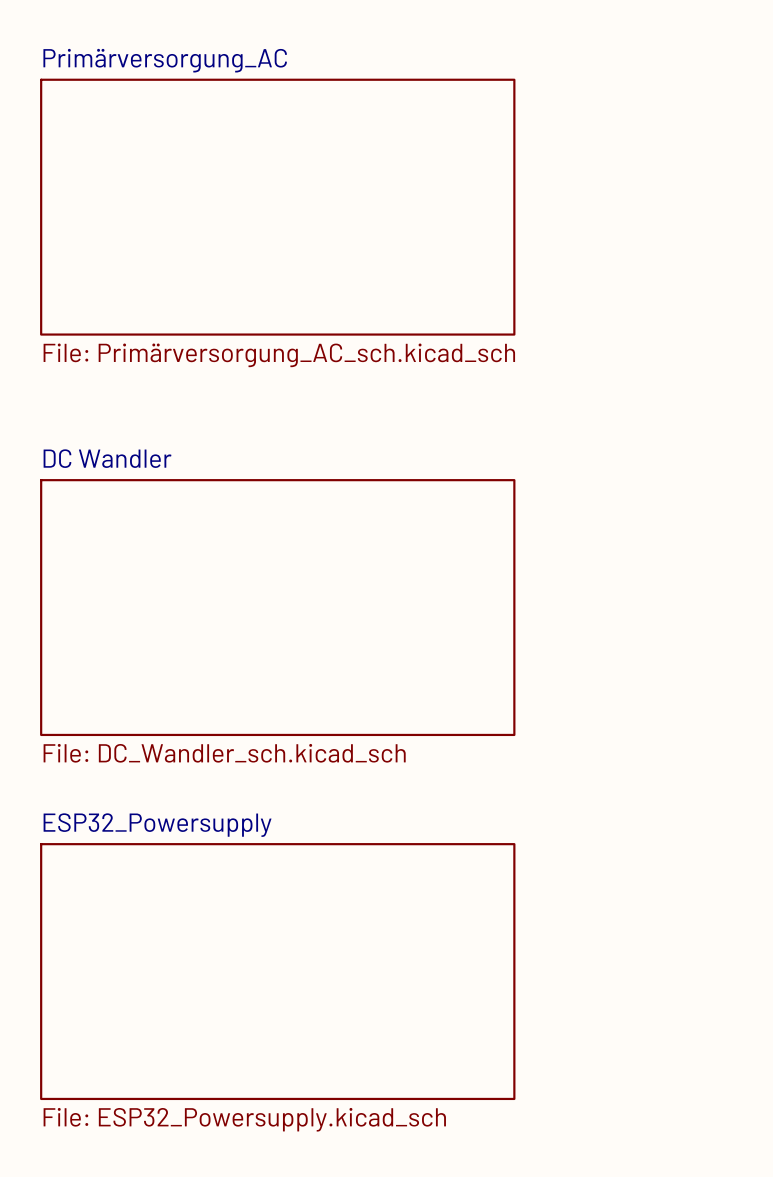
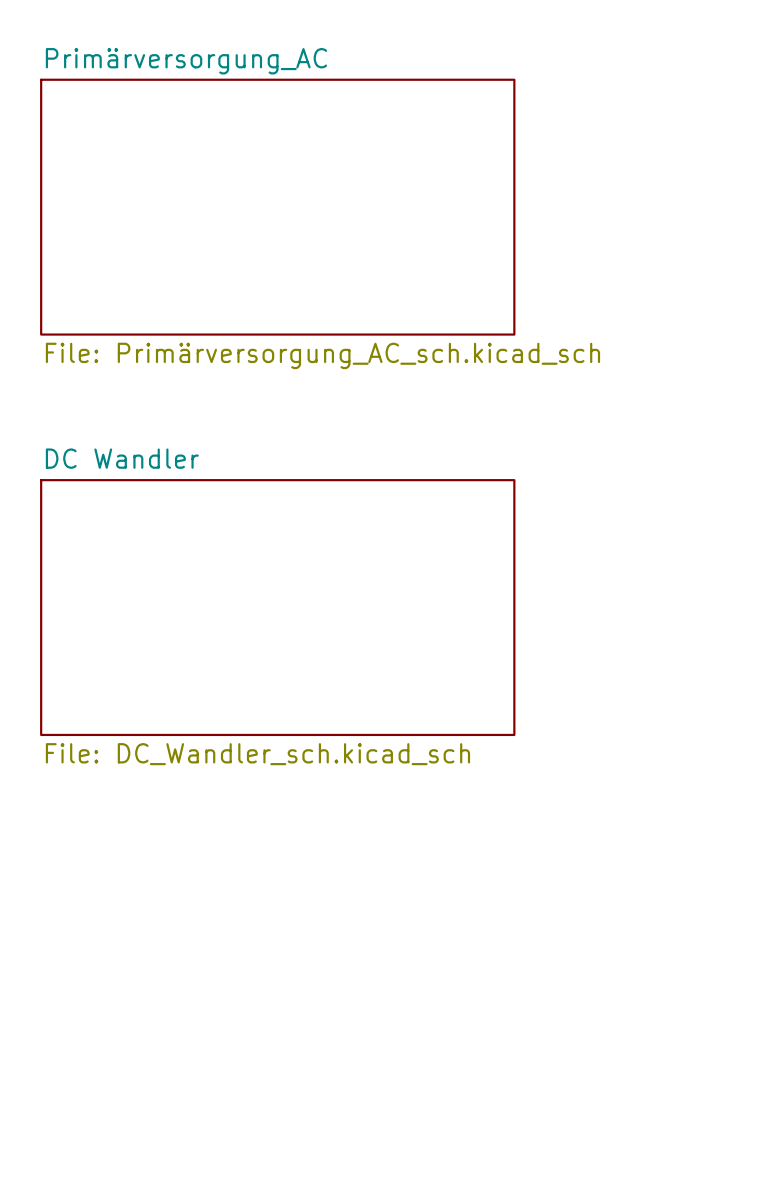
sheet ESP32_Powersupply: File: ESP32_Powersupply.kicad_sch (277, 971) -> none

